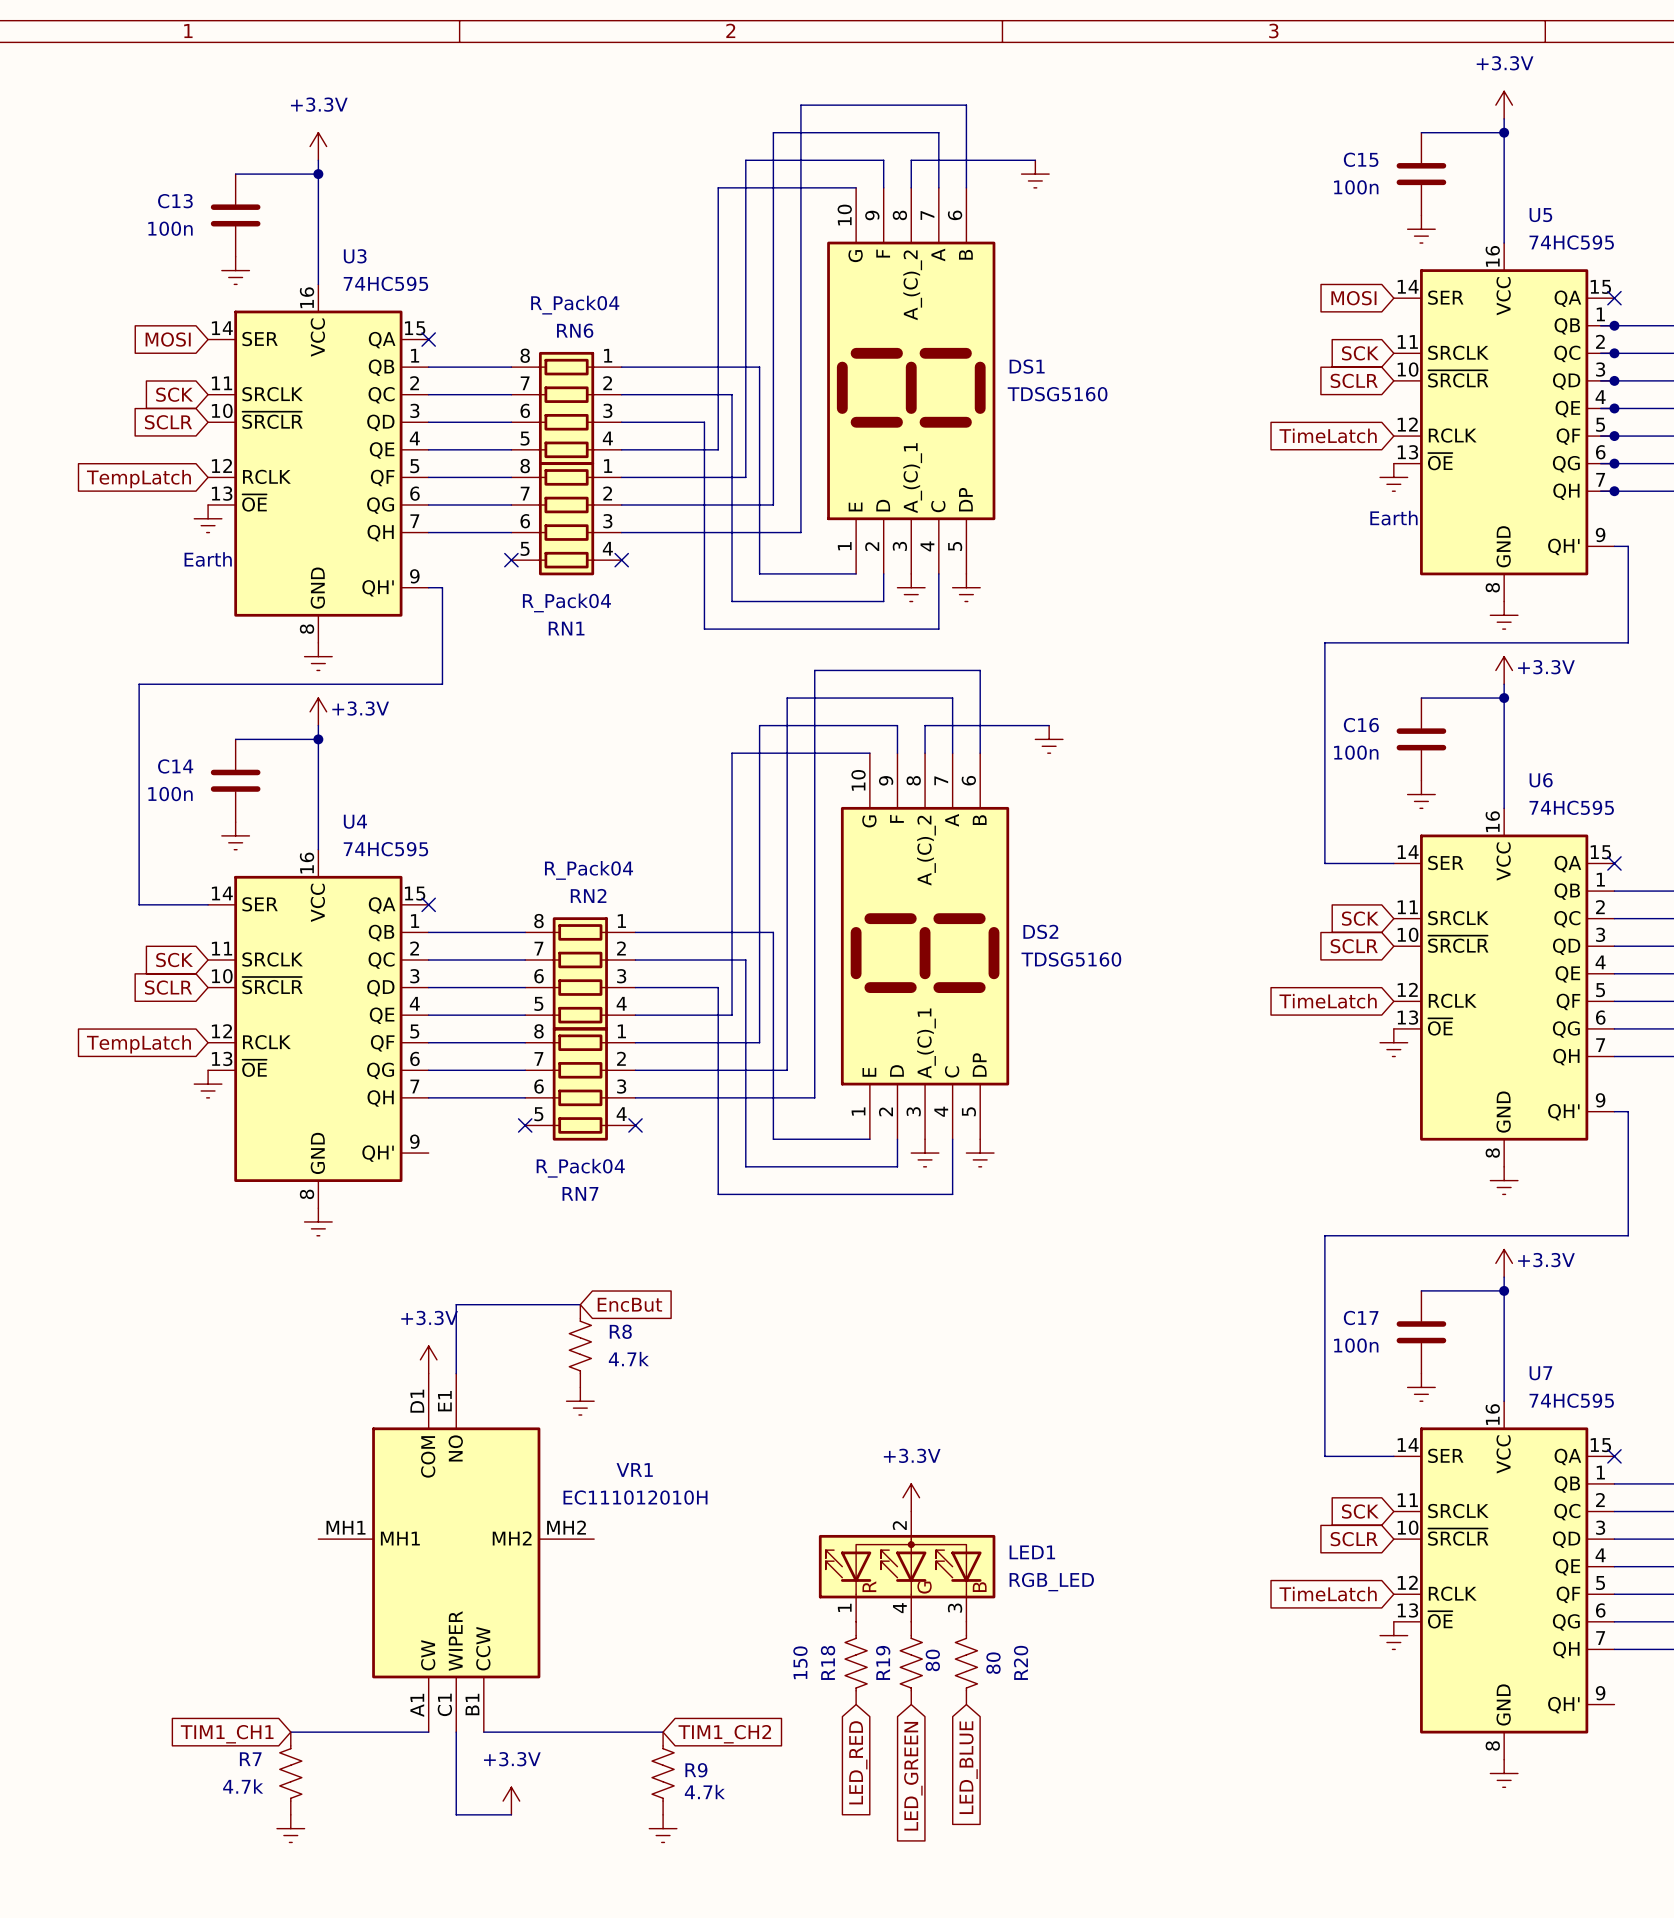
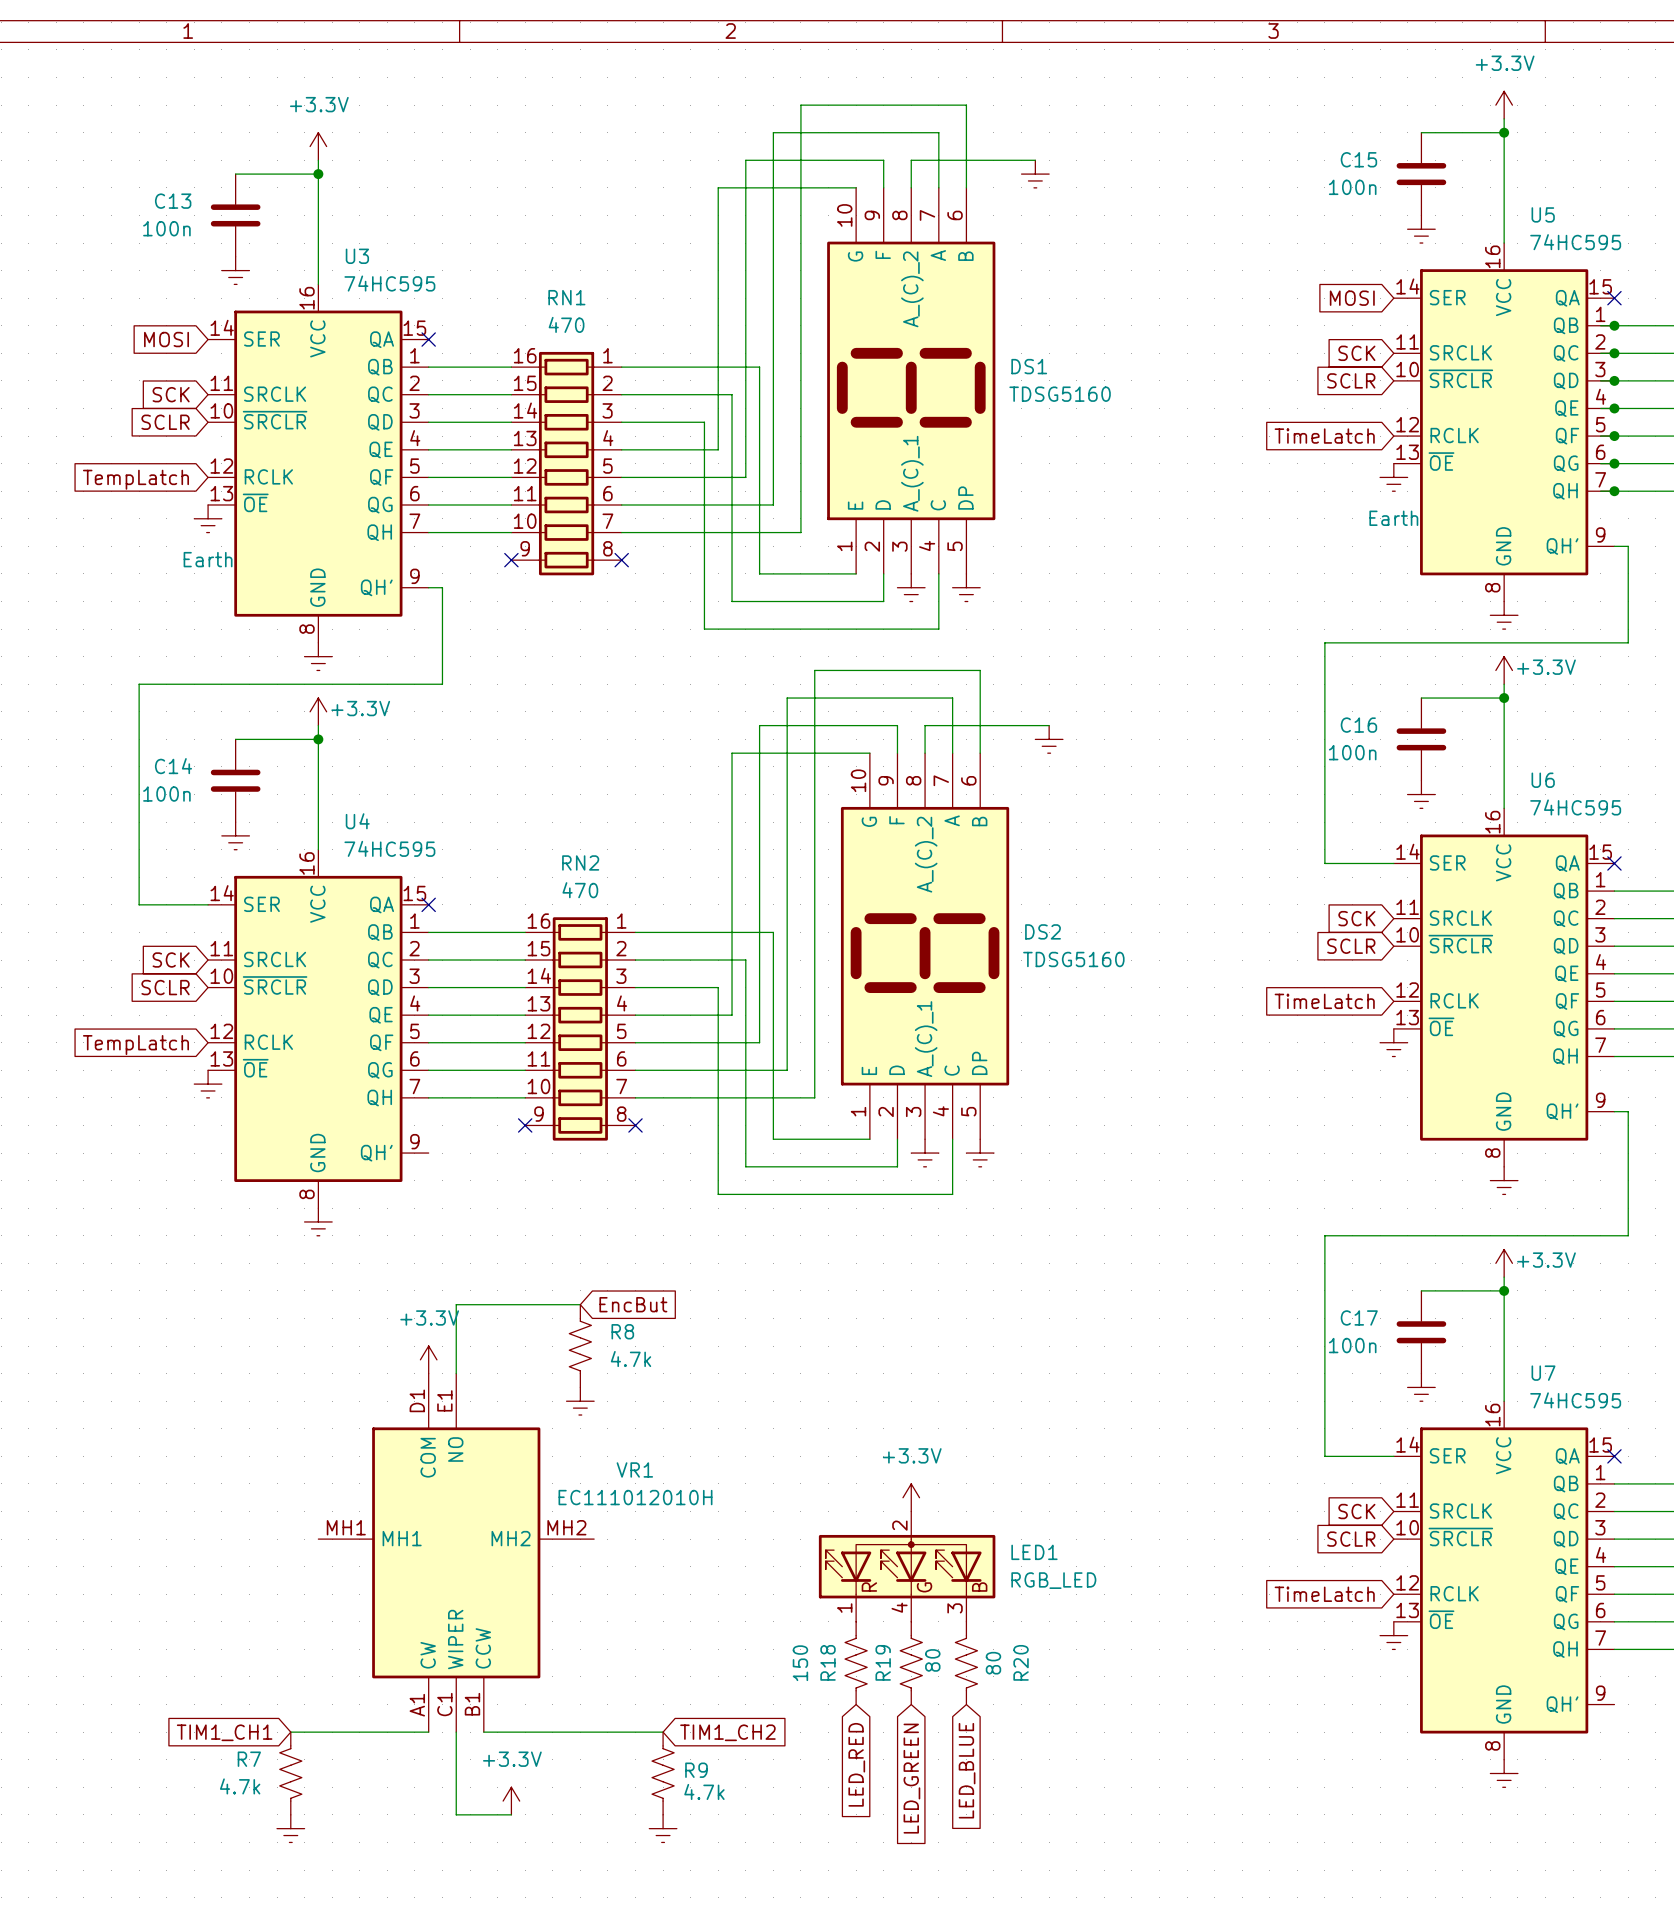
RN6: R_Pack04 (566, 408) -> none
RN1 symbol: [511, 462, 622, 576] -> [511, 351, 622, 576]
RN1 value: R_Pack04 (566, 602) -> 470 (566, 324)
RN1 name position: RN1 (566, 628) -> RN1 (566, 297)
RN2 value: R_Pack04 (589, 870) -> 470 (580, 890)
RN2 name position: RN2 (588, 895) -> RN2 (580, 862)
RN2 symbol: [525, 917, 636, 1031] -> [525, 917, 636, 1141]
RN7: R_Pack04 (580, 1084) -> none

